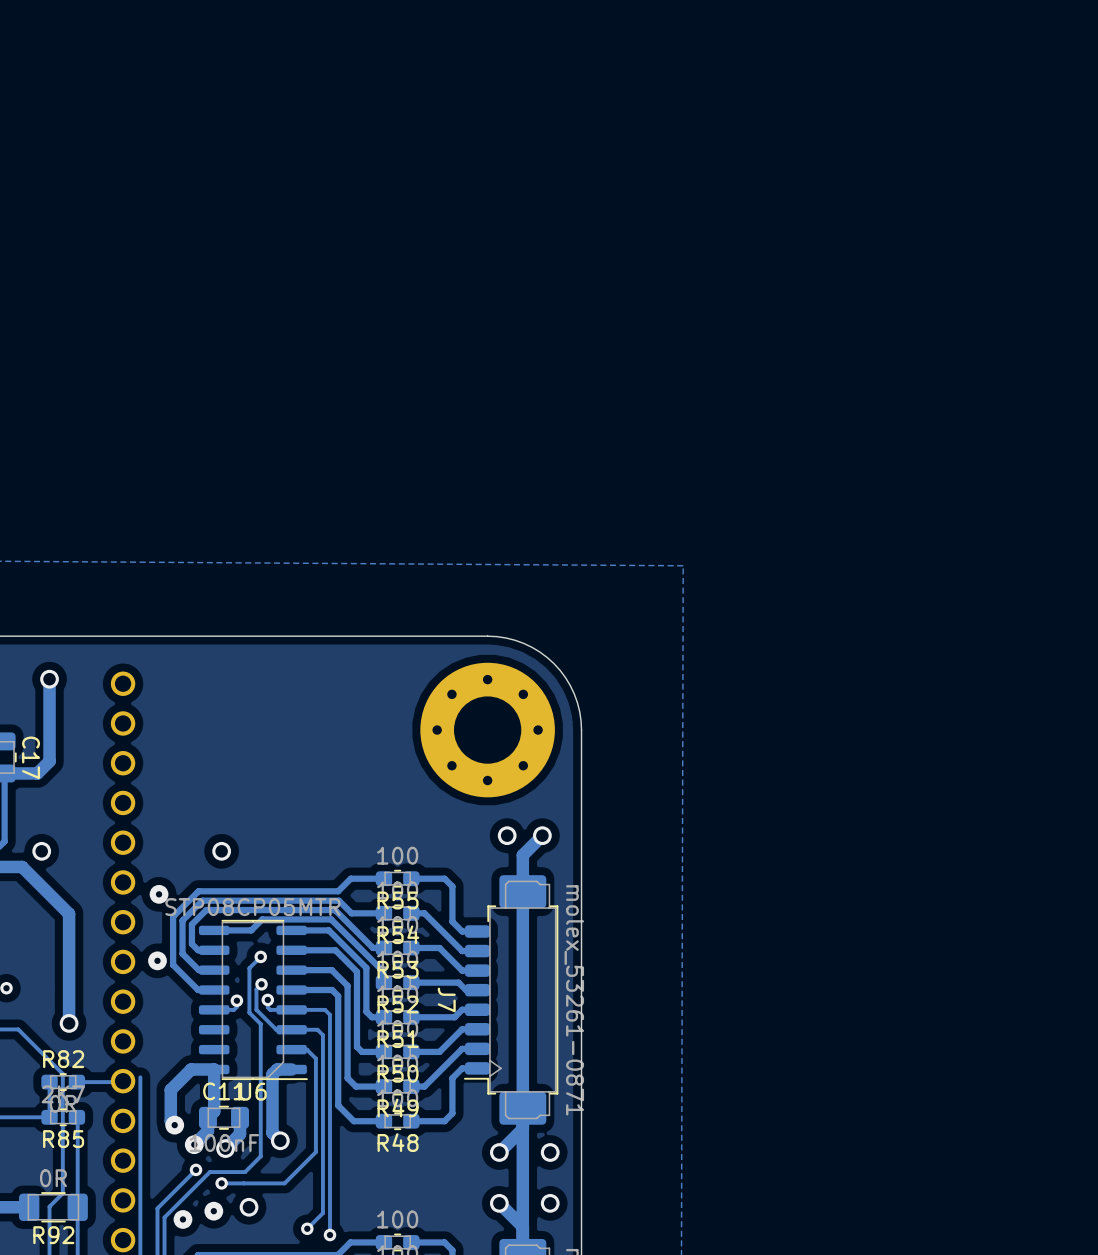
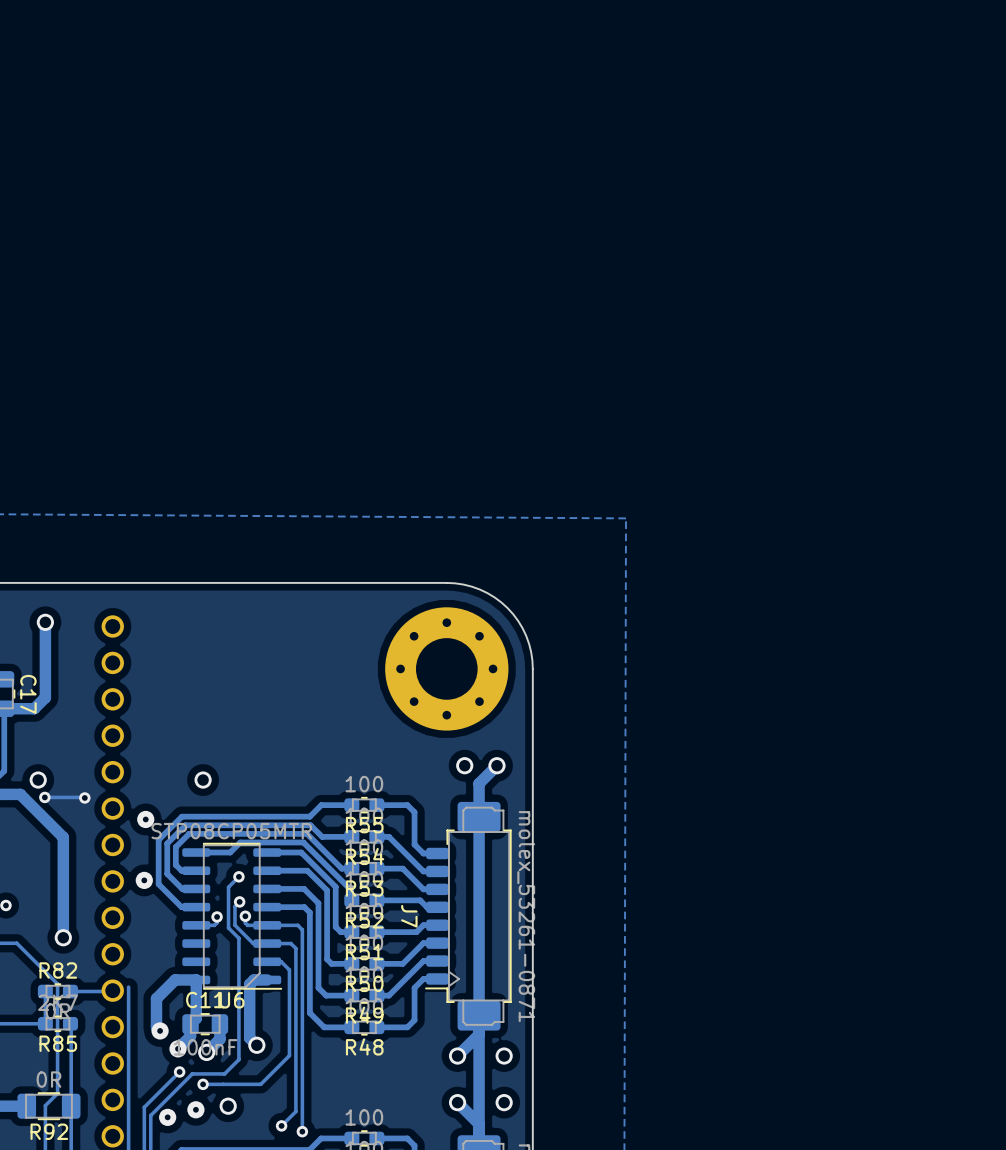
track: none -> (44, 797) (84, 797)
via: none -> (44, 797)
via: none -> (84, 797)

